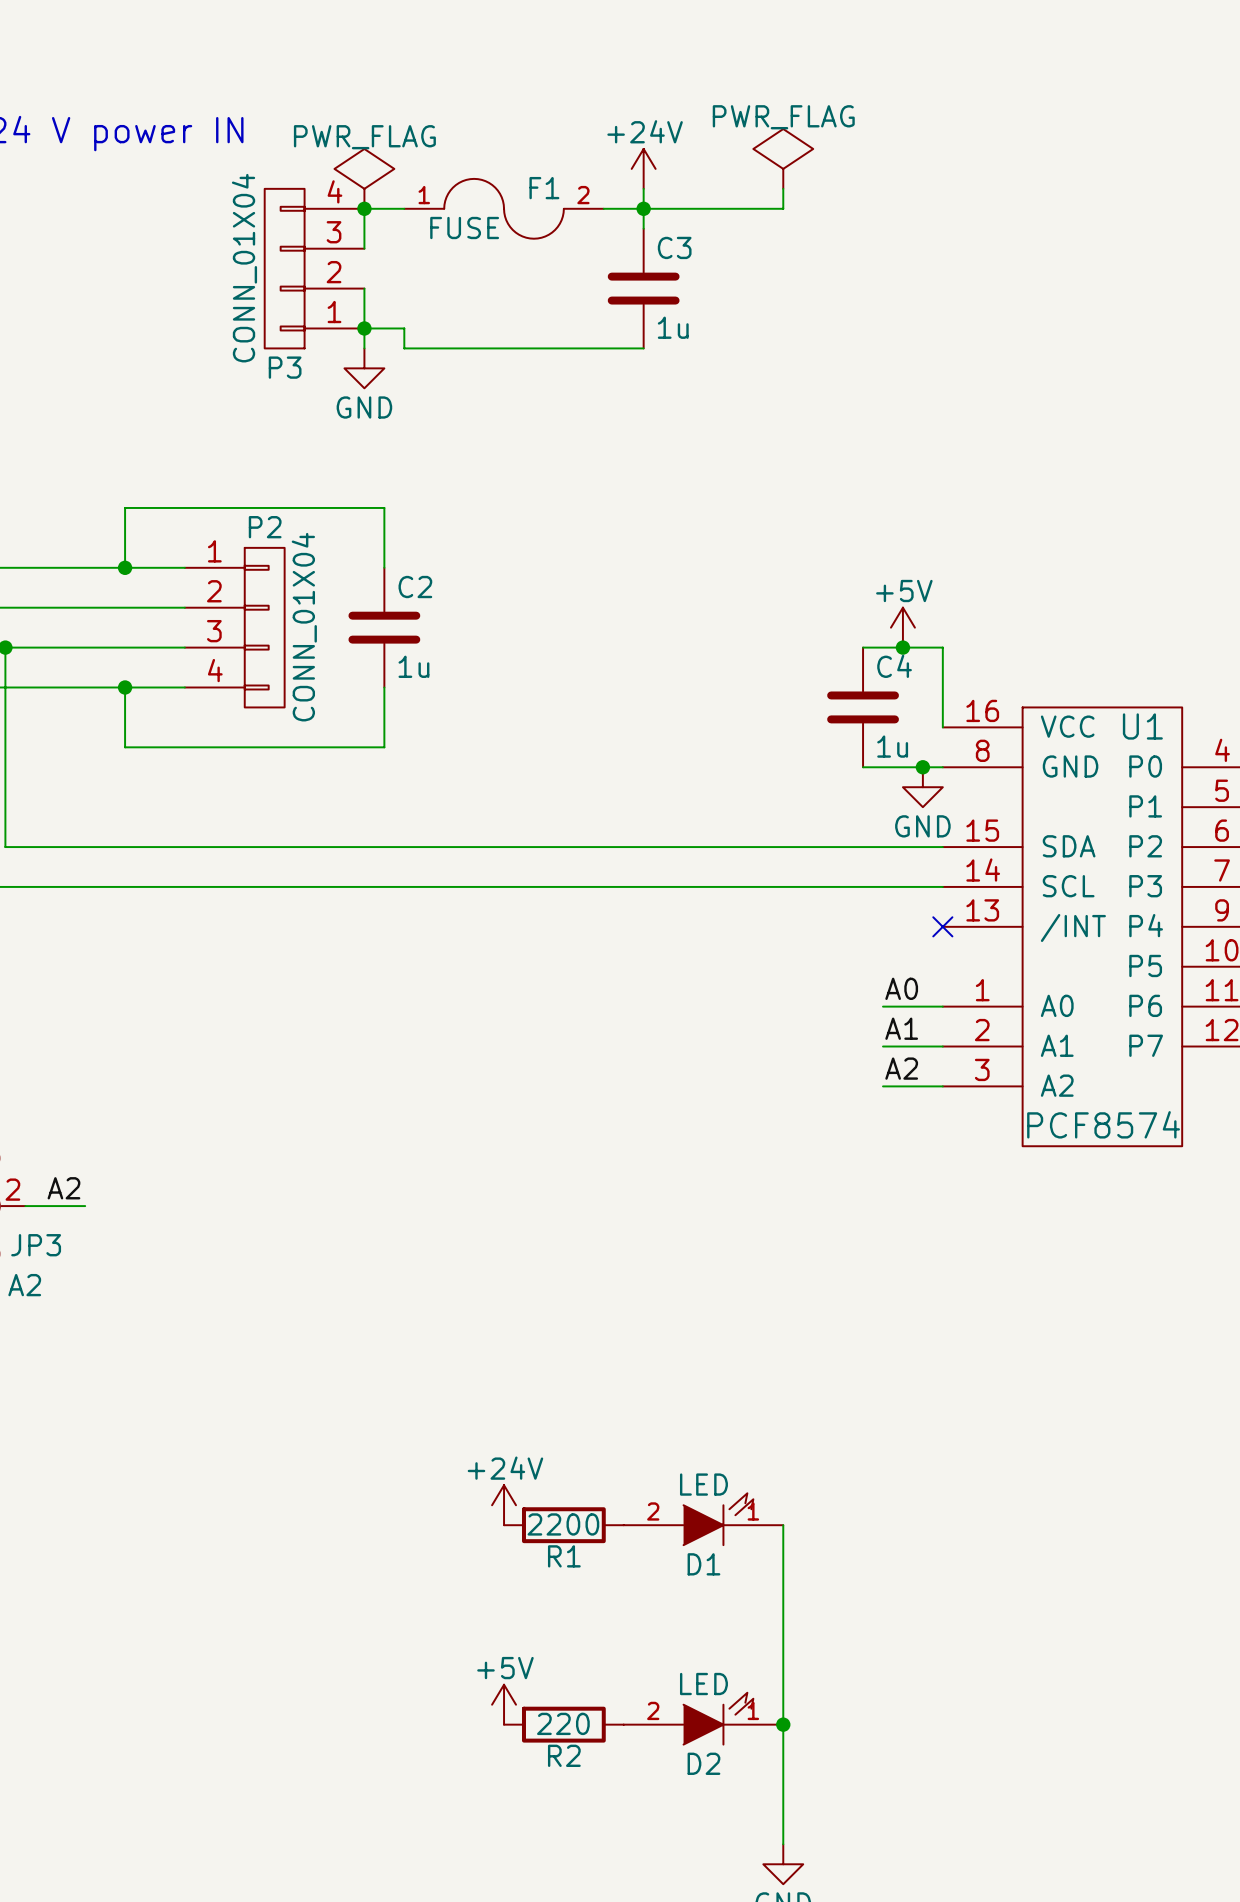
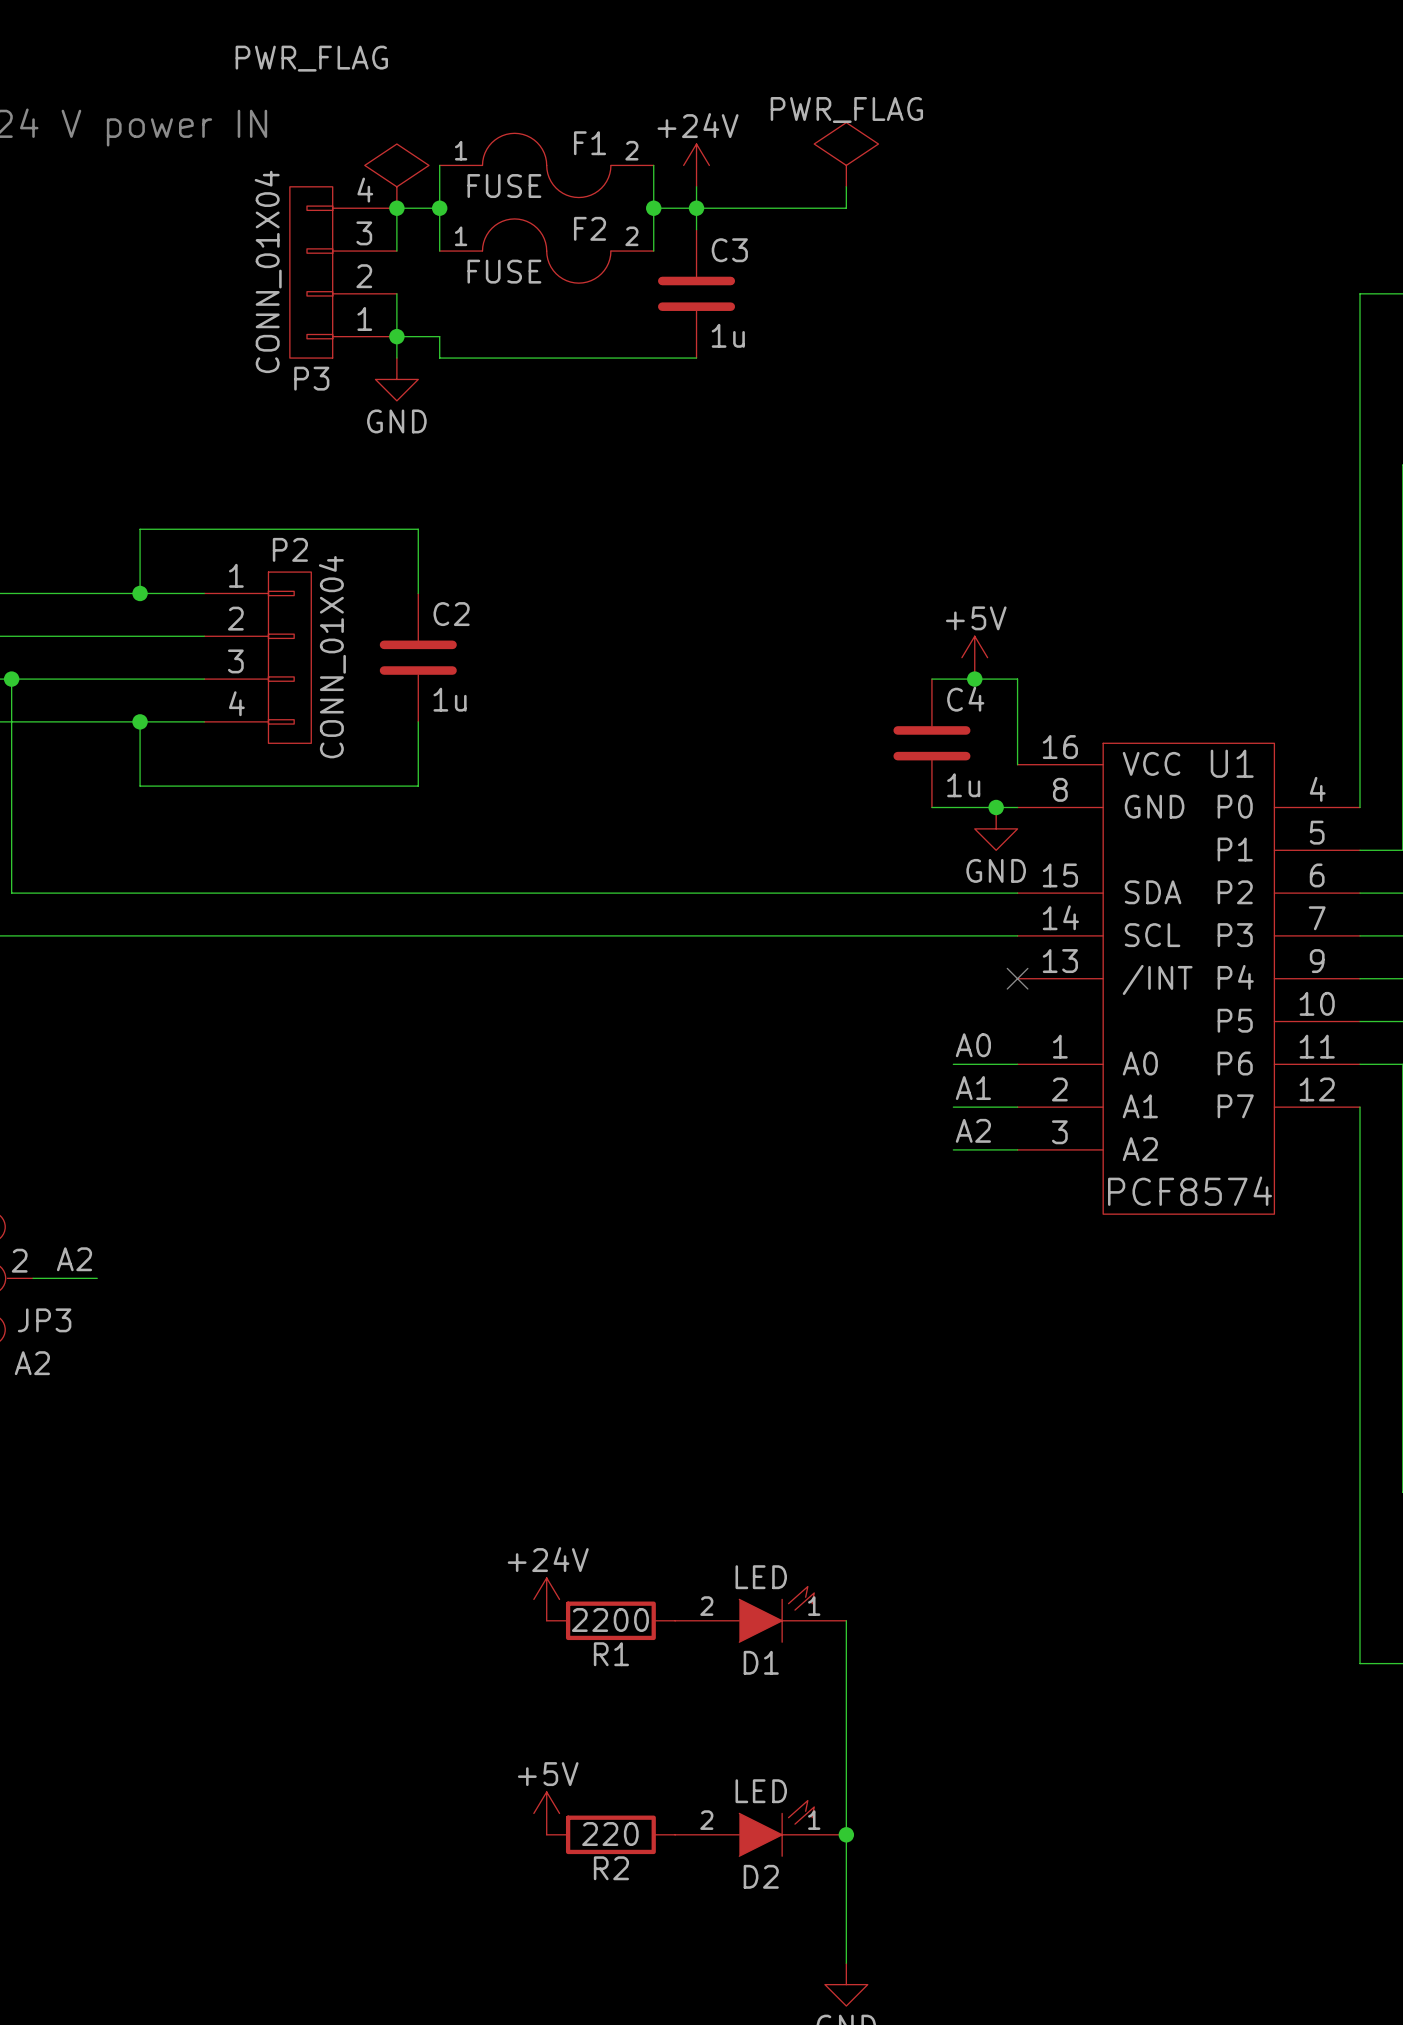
power symbol text position: PWR_FLAG (364, 137) -> PWR_FLAG (311, 58)
wire: none -> (439, 165) (439, 251)
wire: none -> (653, 165) (653, 251)
junction: none -> (439, 208)
F1 position: (504, 208) -> (546, 165)
junction: none -> (653, 208)
F2: none -> FUSE (546, 251)

